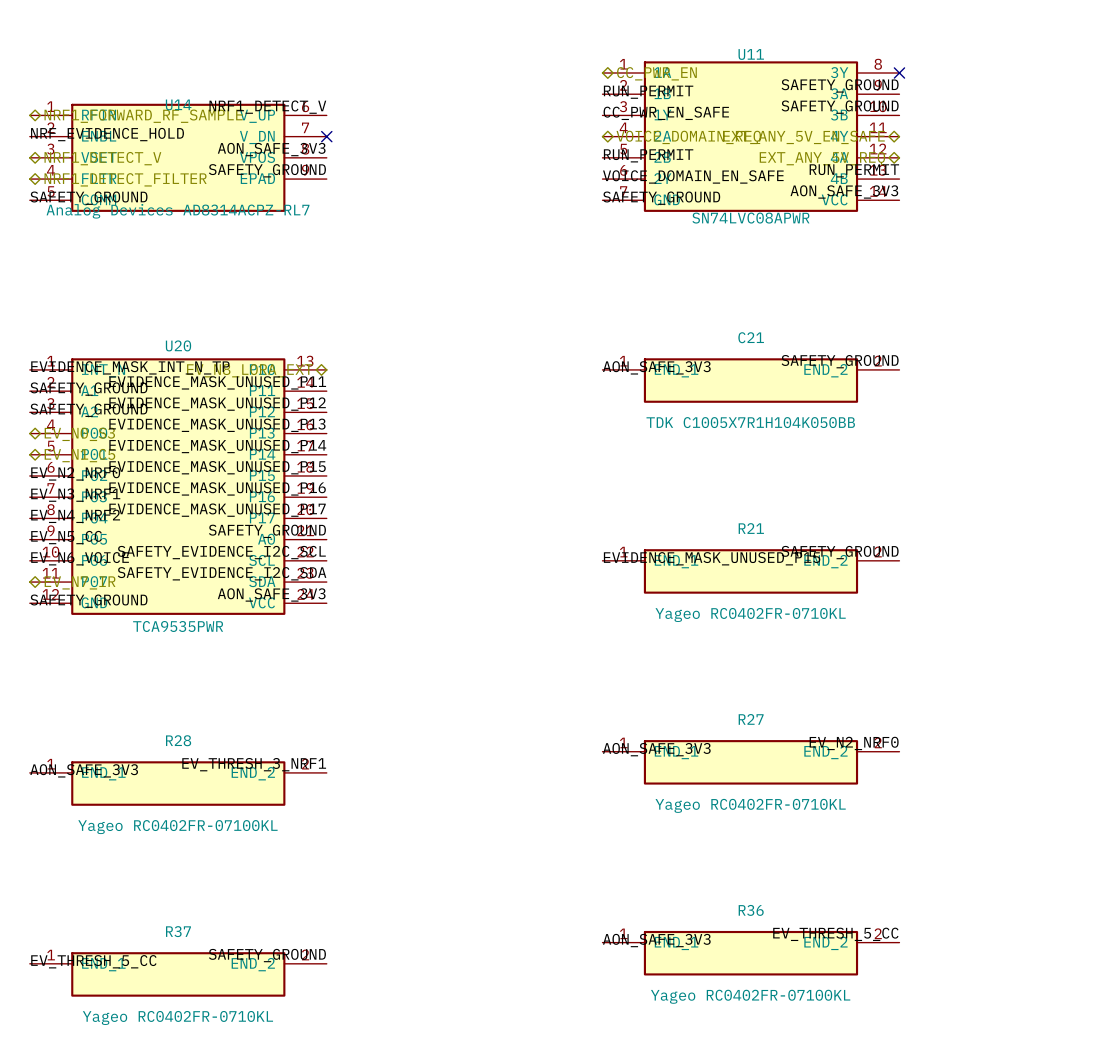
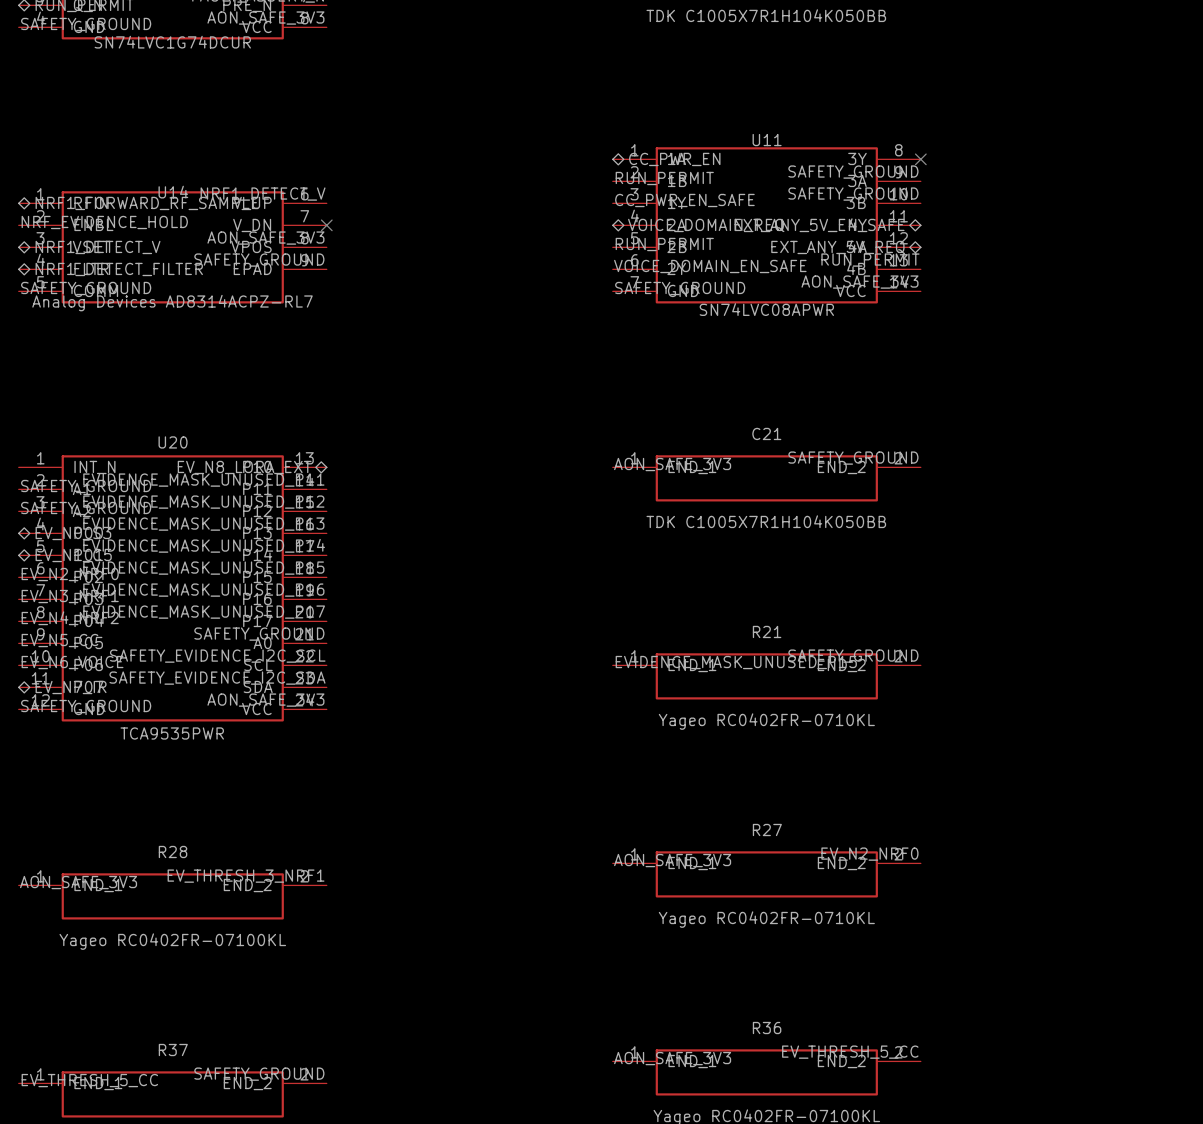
label: EVIDENCE_MASK_INT_N_TP (130, 367) -> none

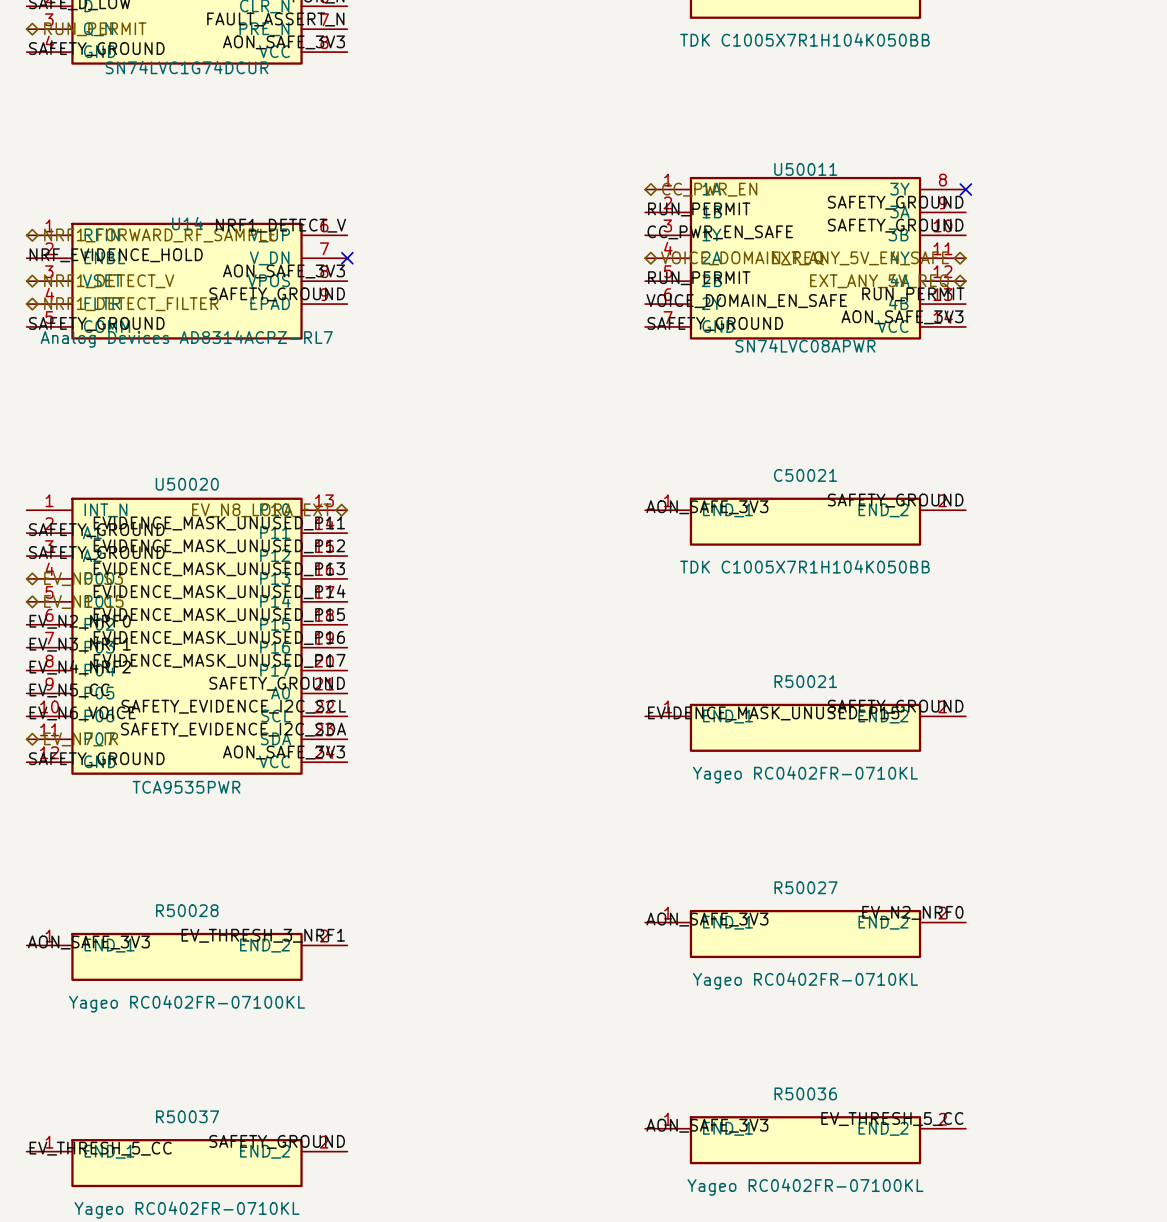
U11 name: U11 (767, 140) -> U50011 (805, 169)
C21 name: C21 (766, 433) -> C50021 (805, 475)
U20 name: U20 (173, 442) -> U50020 (187, 484)
R21 name: R21 (767, 631) -> R50021 (805, 681)
R27 name: R27 (767, 829) -> R50027 (806, 887)
R28 name: R28 (173, 851) -> R50028 (187, 910)
R36 name: R36 (767, 1028) -> R50036 (805, 1093)
R37 name: R37 (173, 1050) -> R50037 (187, 1116)

